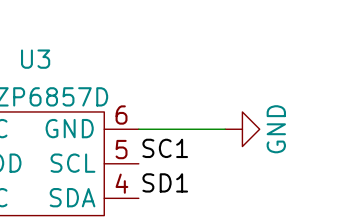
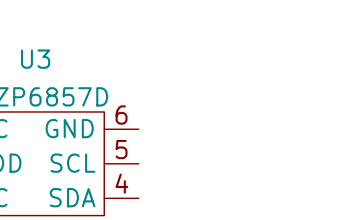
wire: (138, 129) (225, 129) -> none
power symbol: GND (242, 129) -> none
label: SC1 (165, 148) -> none
label: SD1 (165, 182) -> none

